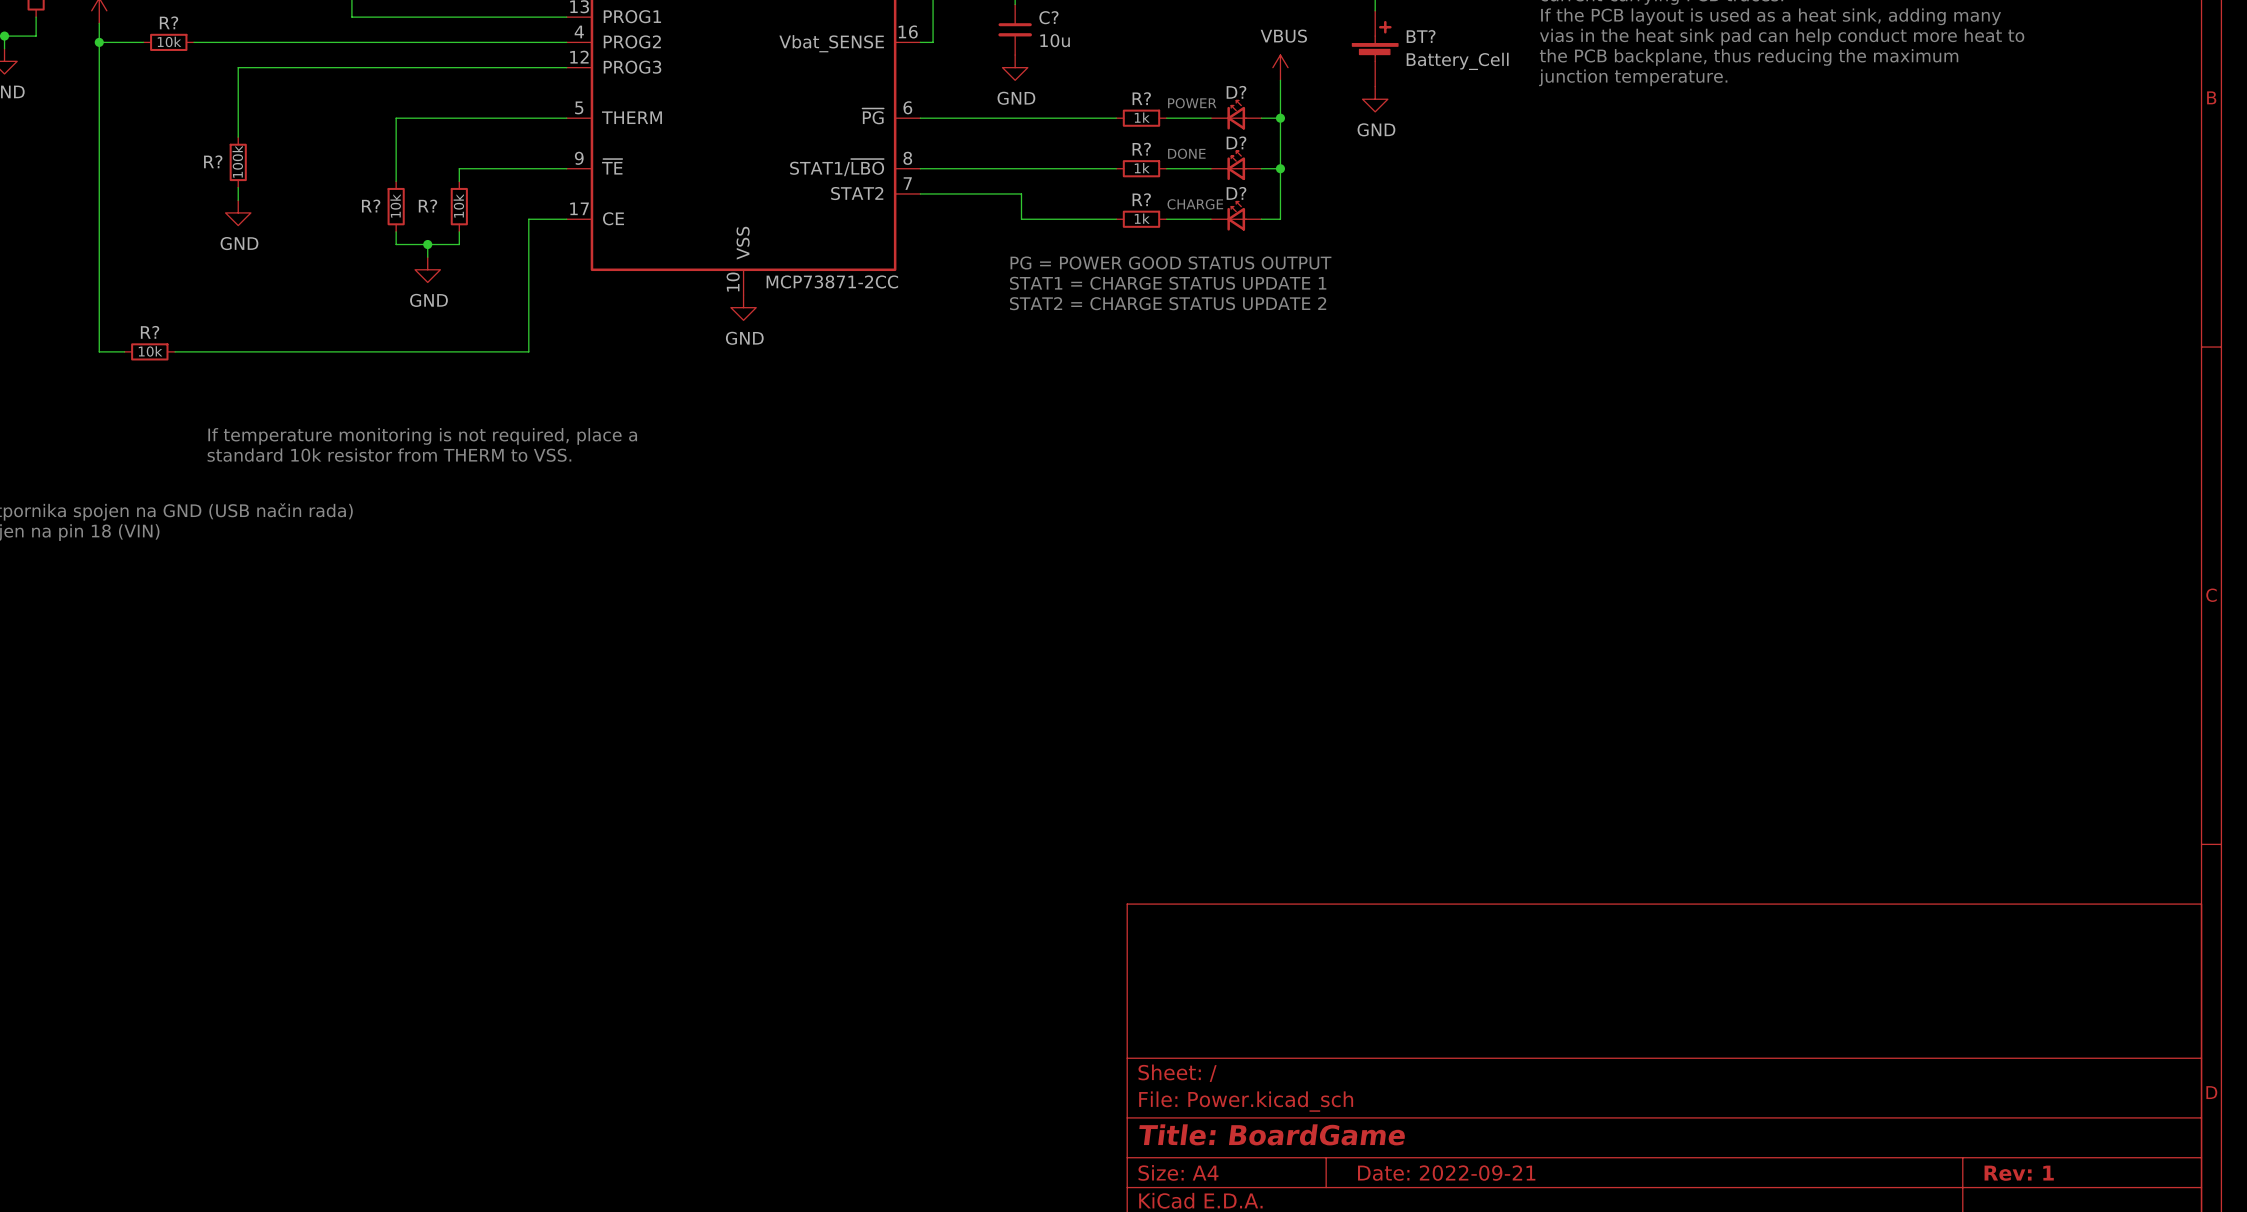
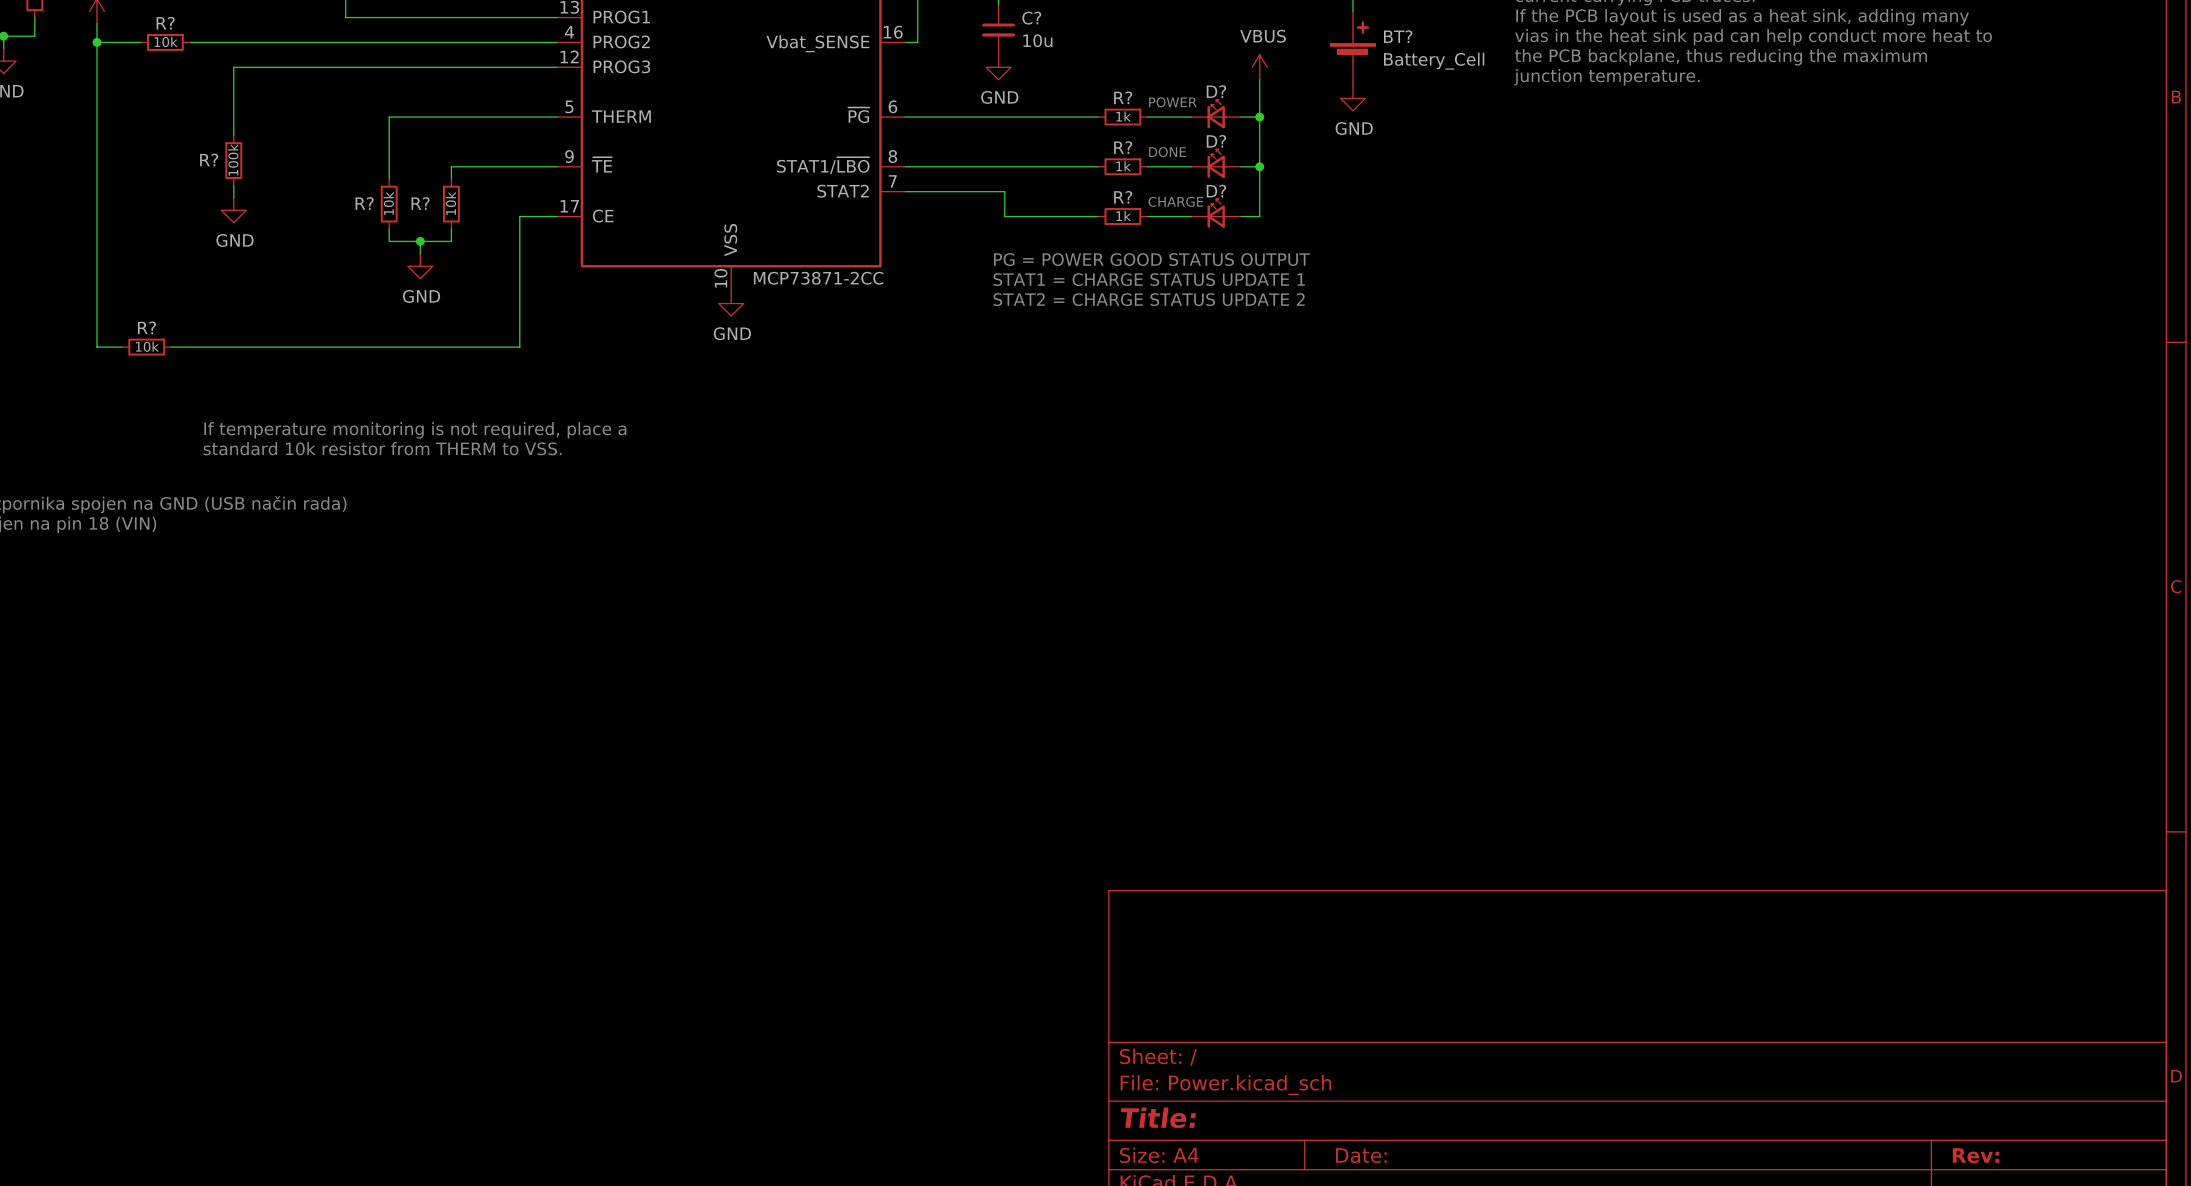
title block: Title: BoardGame (1272, 1134) -> Title: (1158, 1117)
title block: Date: 2022-09-21 (1446, 1173) -> Date: (1361, 1155)
title block: Rev: 1 (2019, 1173) -> Rev: (1975, 1155)

